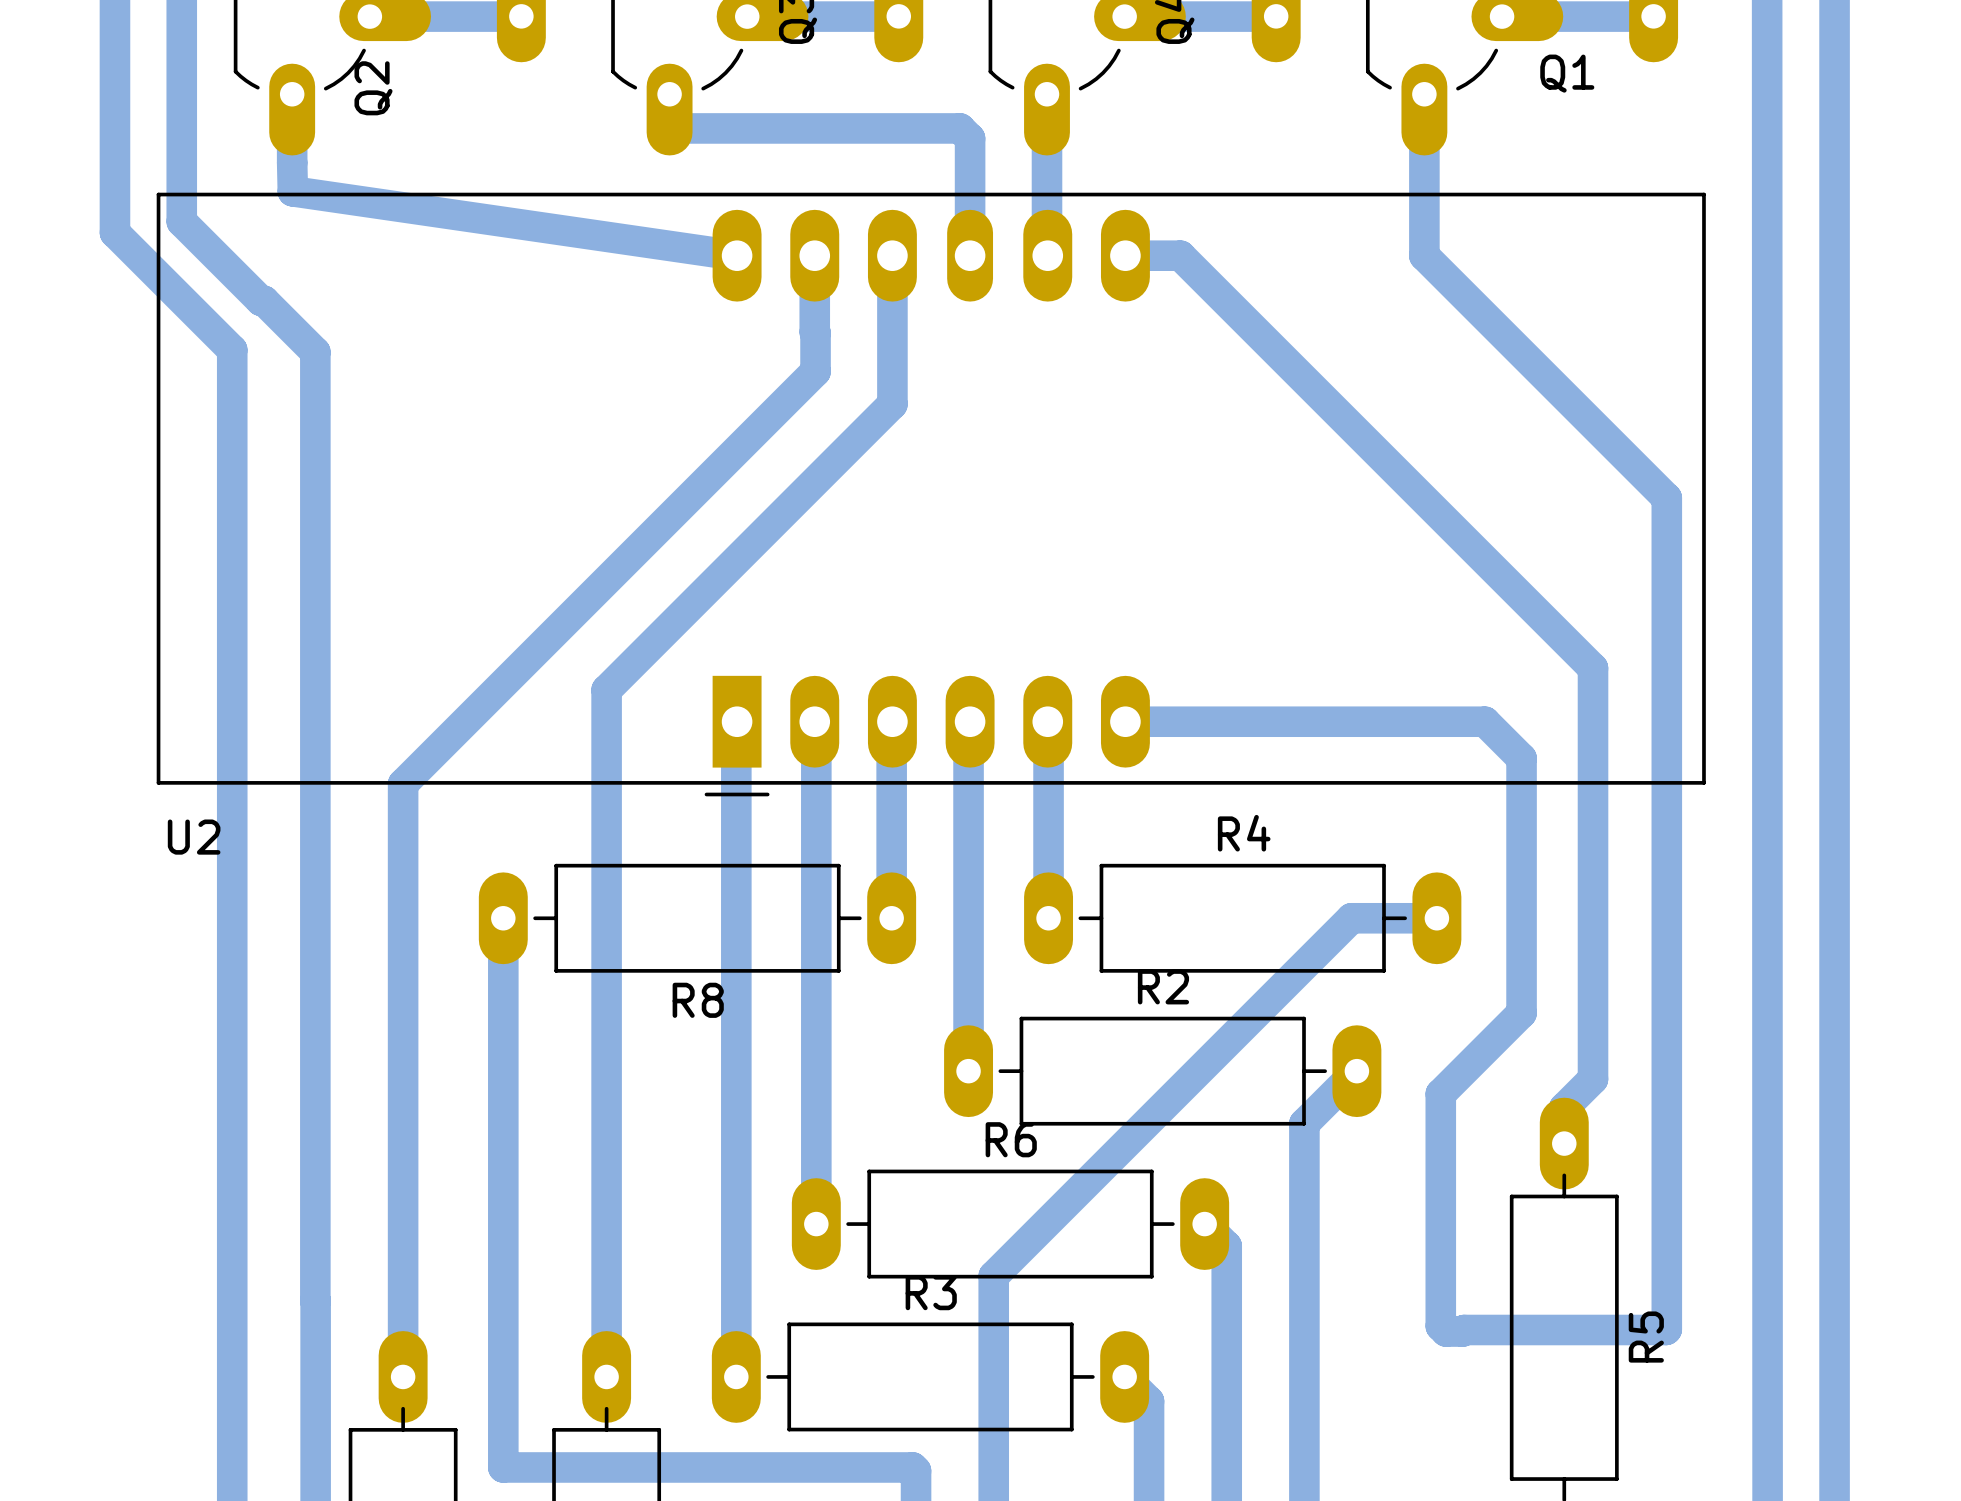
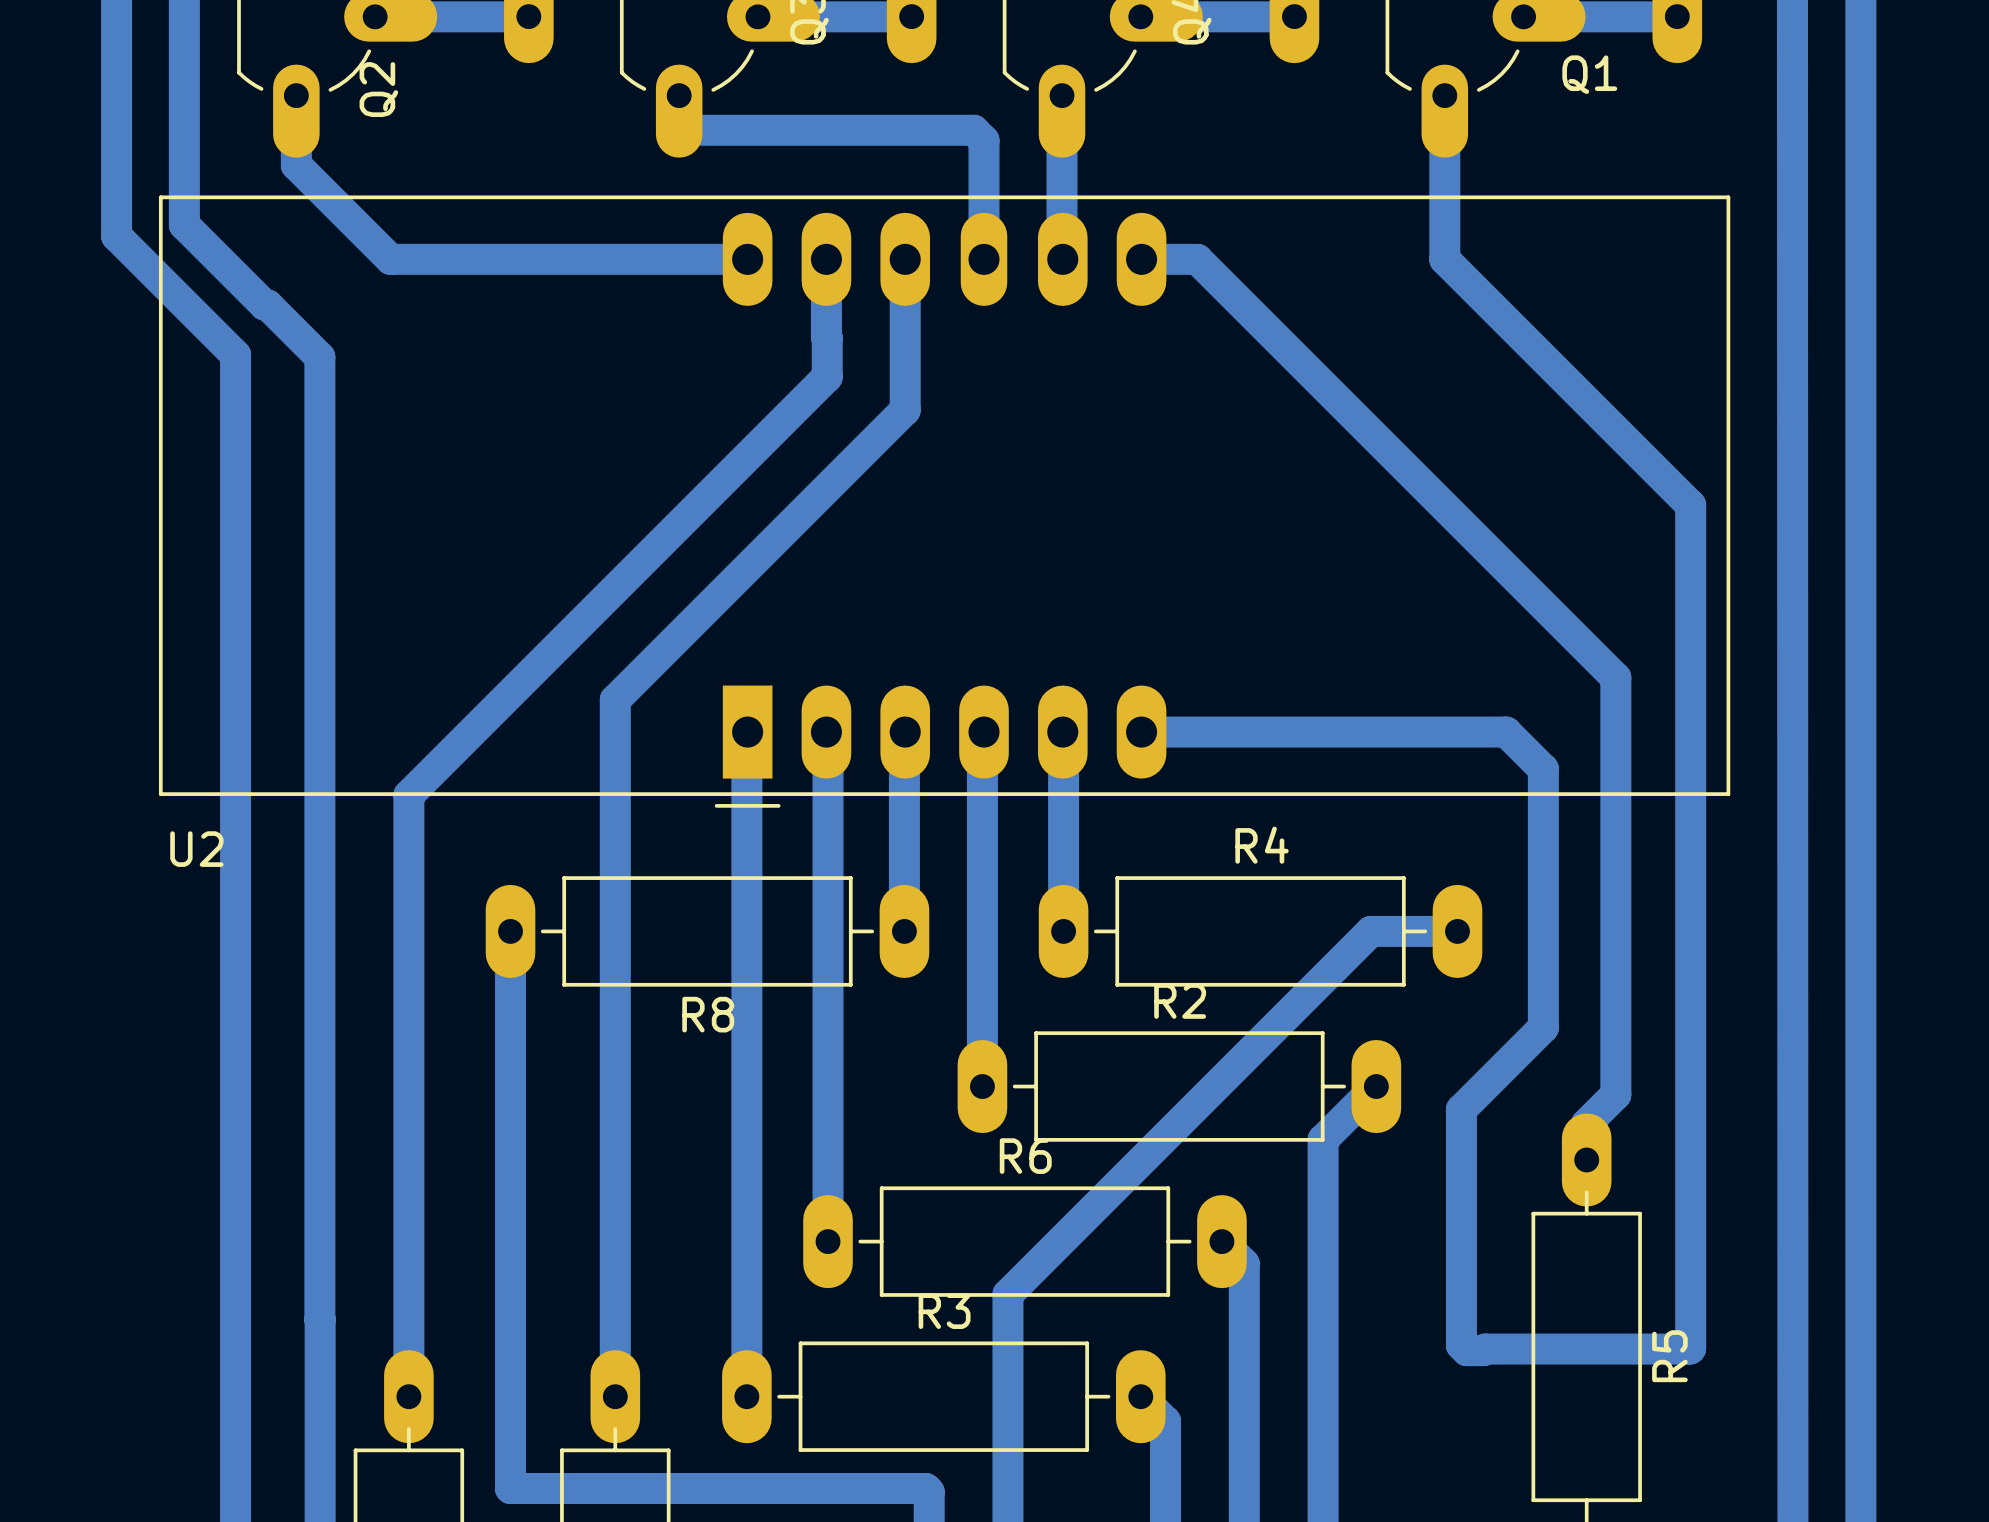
bottom track: (292, 162) (292, 191) (737, 255) -> (296, 165) (390, 259) (747, 259)

